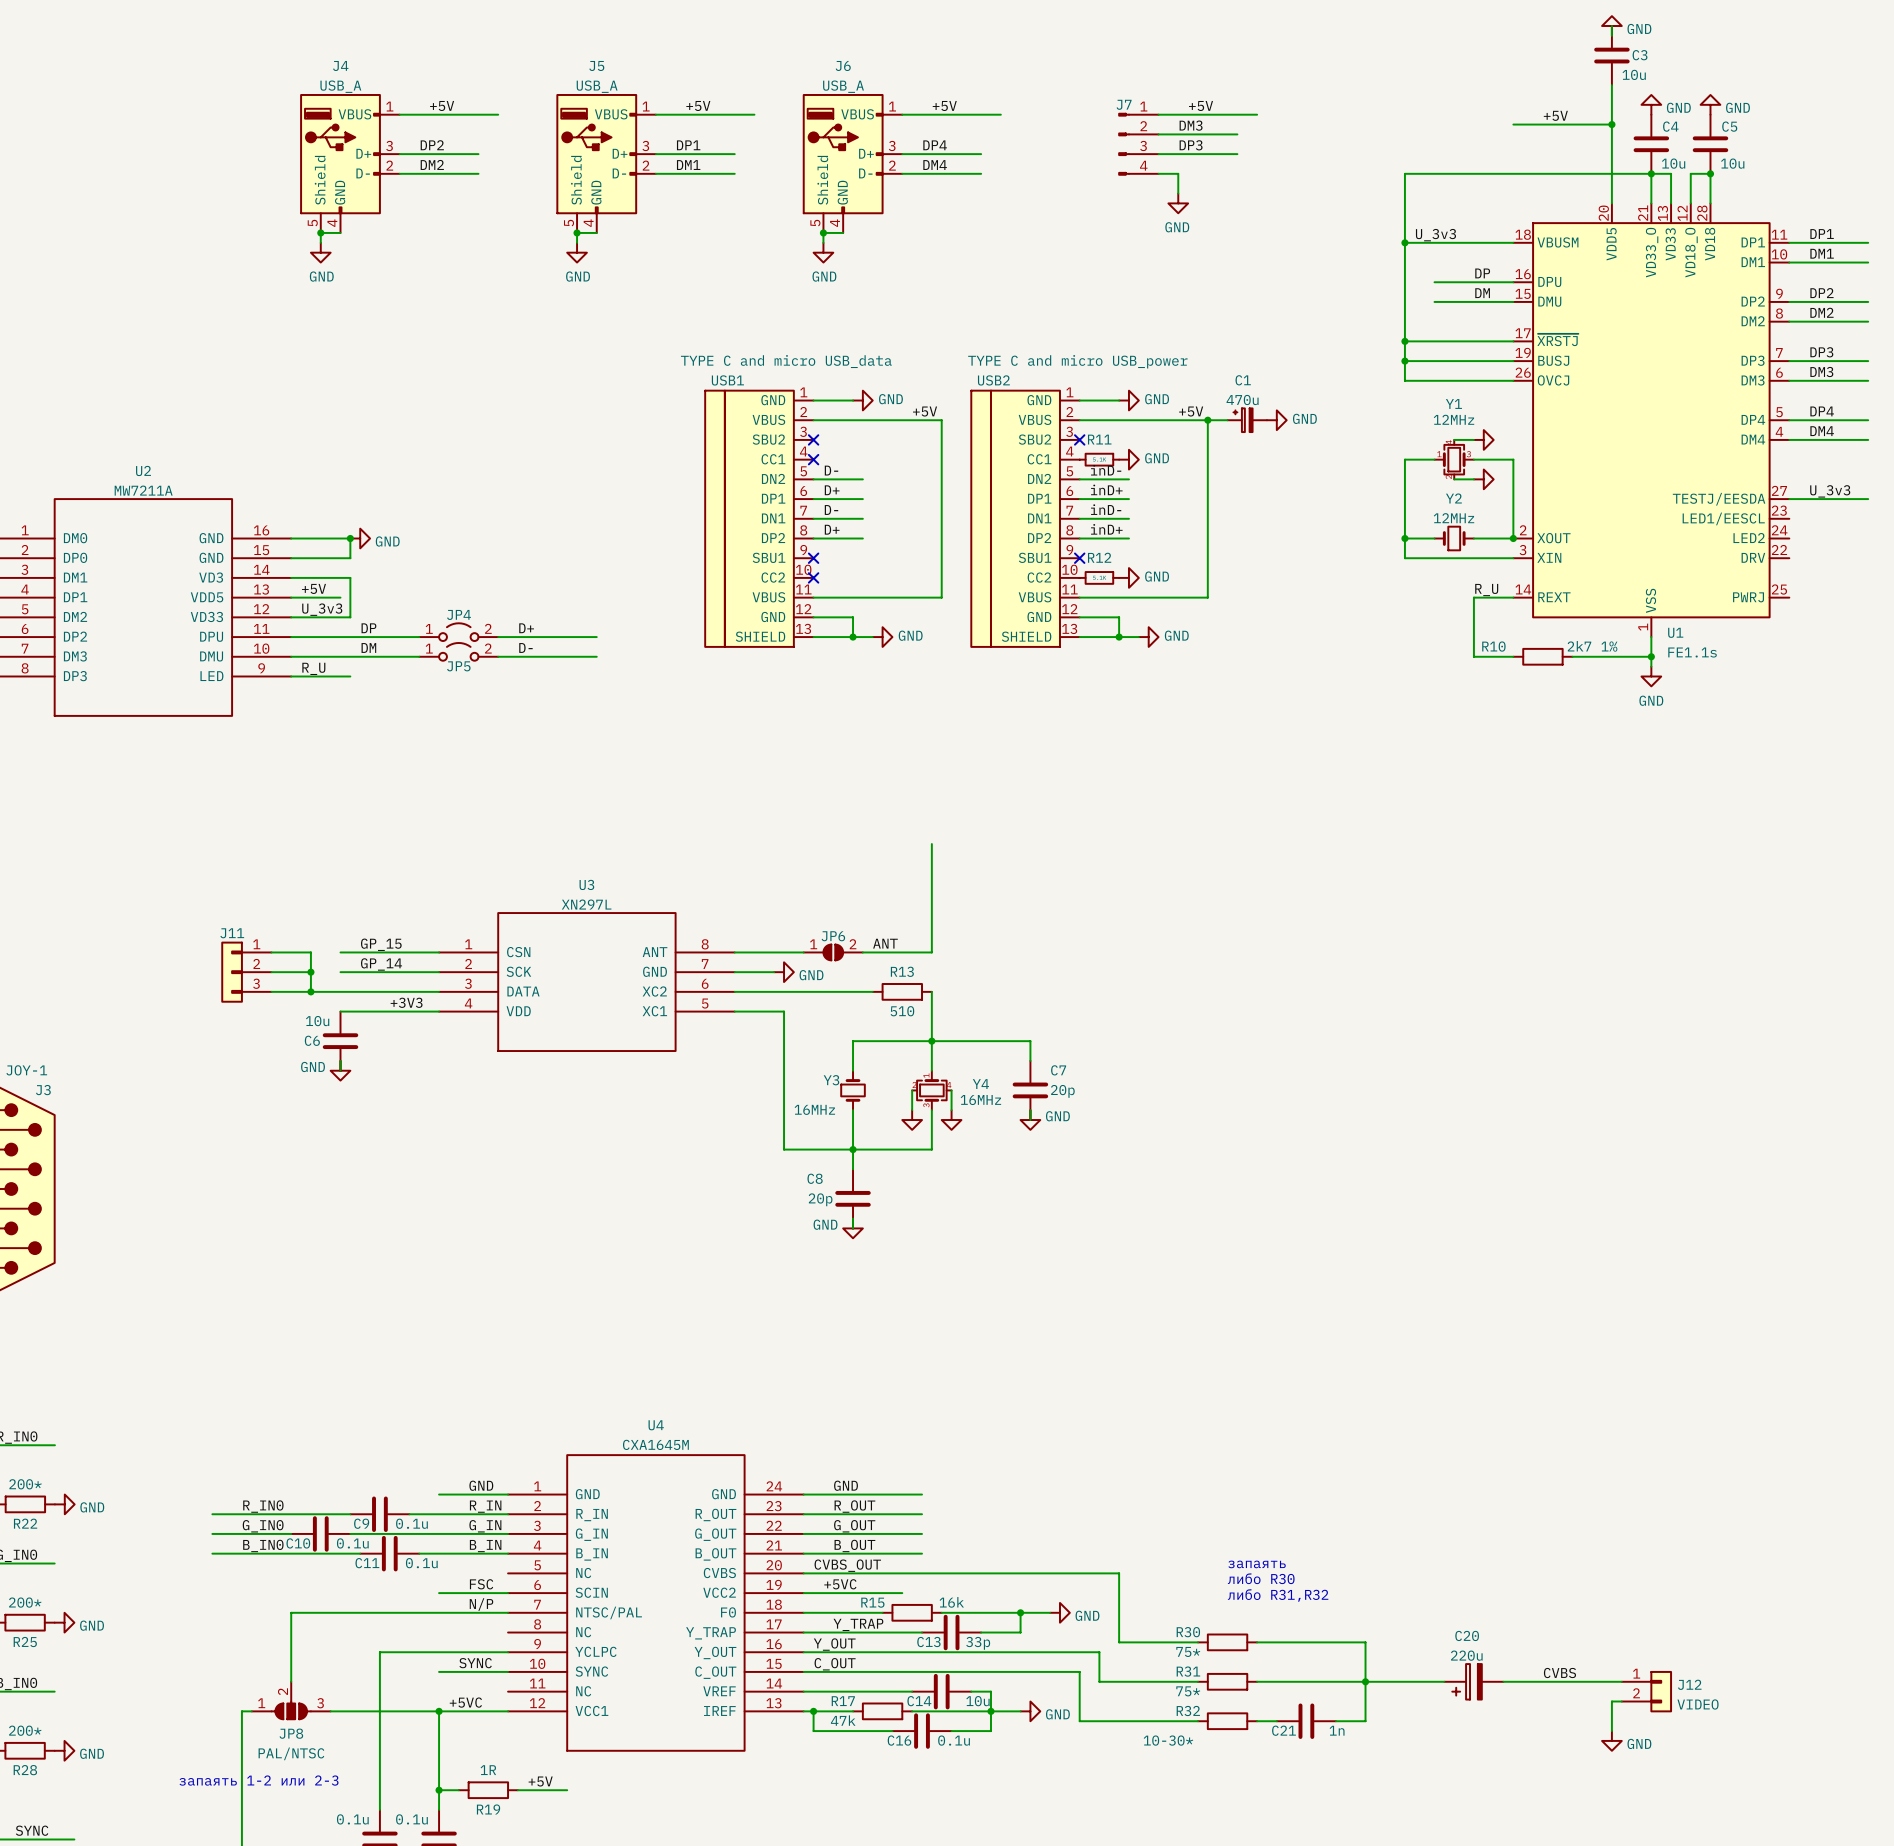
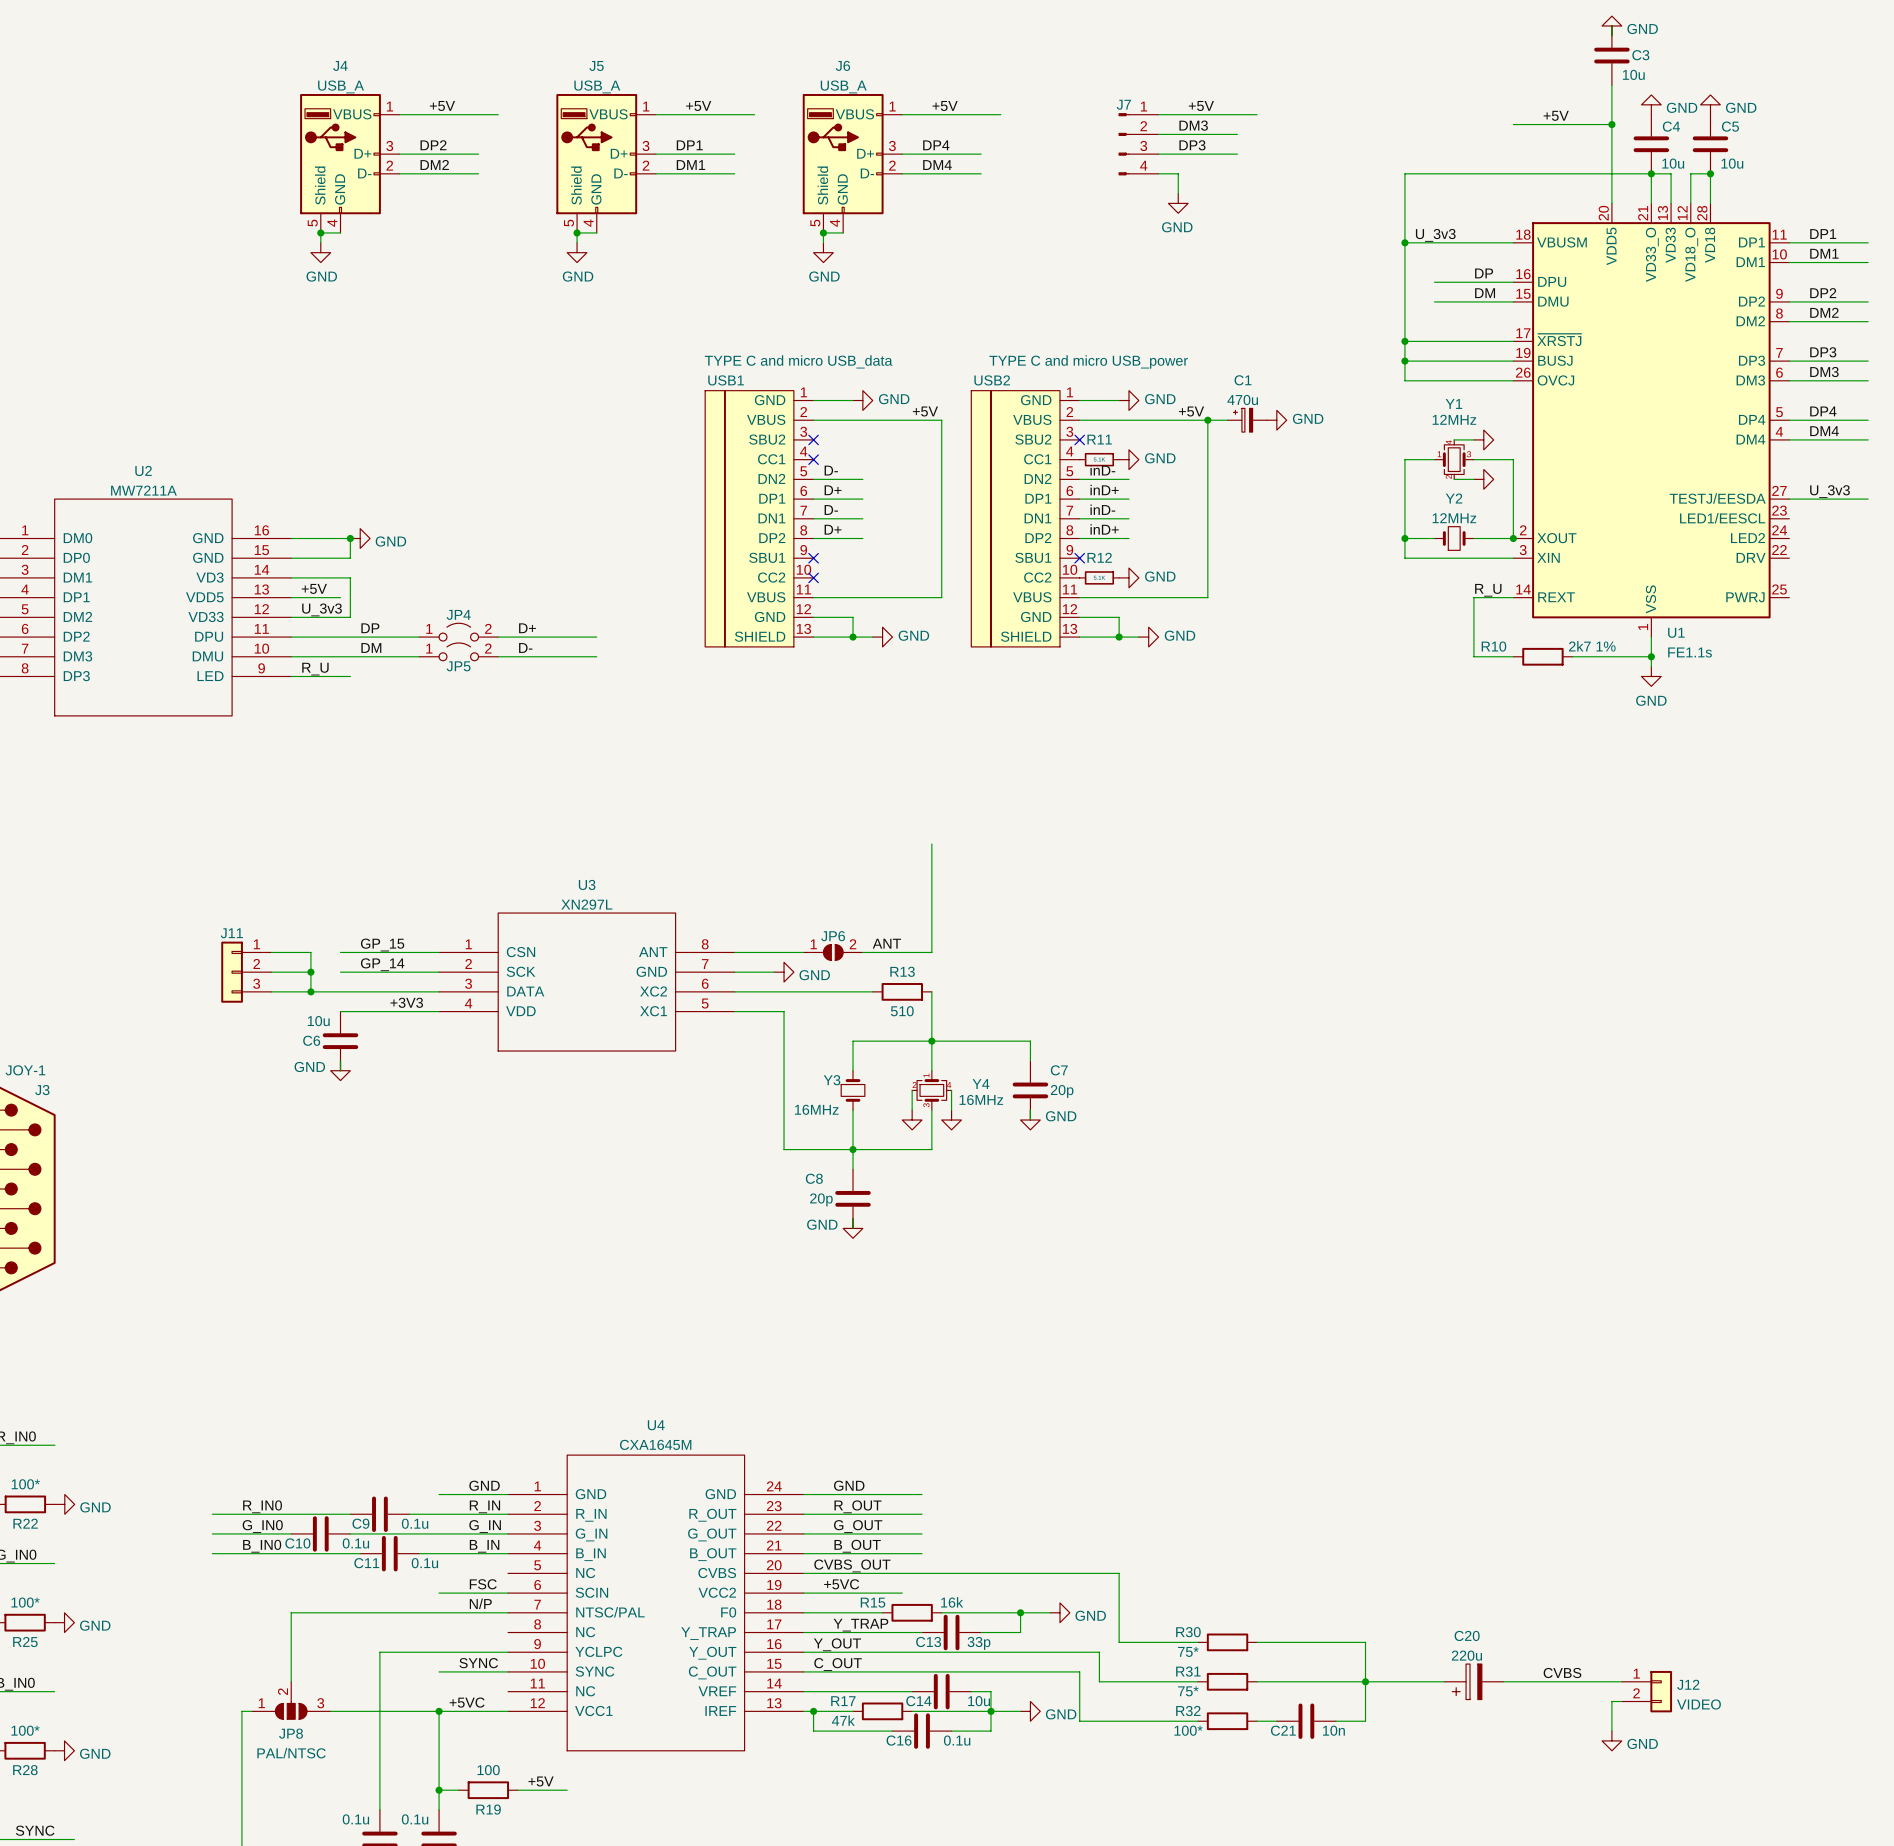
R22 value: 200* (25, 1484) -> 100* (25, 1484)
text: запаять (1257, 1564) -> none
text: либо R30 (1261, 1578) -> none
text: либо R31,R32 (1278, 1595) -> none
R25 value: 200* (25, 1602) -> 100* (25, 1602)
R28 value: 200* (25, 1730) -> 100* (25, 1730)
C21 value: 1n (1337, 1730) -> 10n (1333, 1730)
R32 value: 10-30* (1168, 1740) -> 100* (1188, 1730)
R19 value: 1R (488, 1770) -> 100 (488, 1770)
text: запаять 1-2 или 2-3 (259, 1780) -> none

